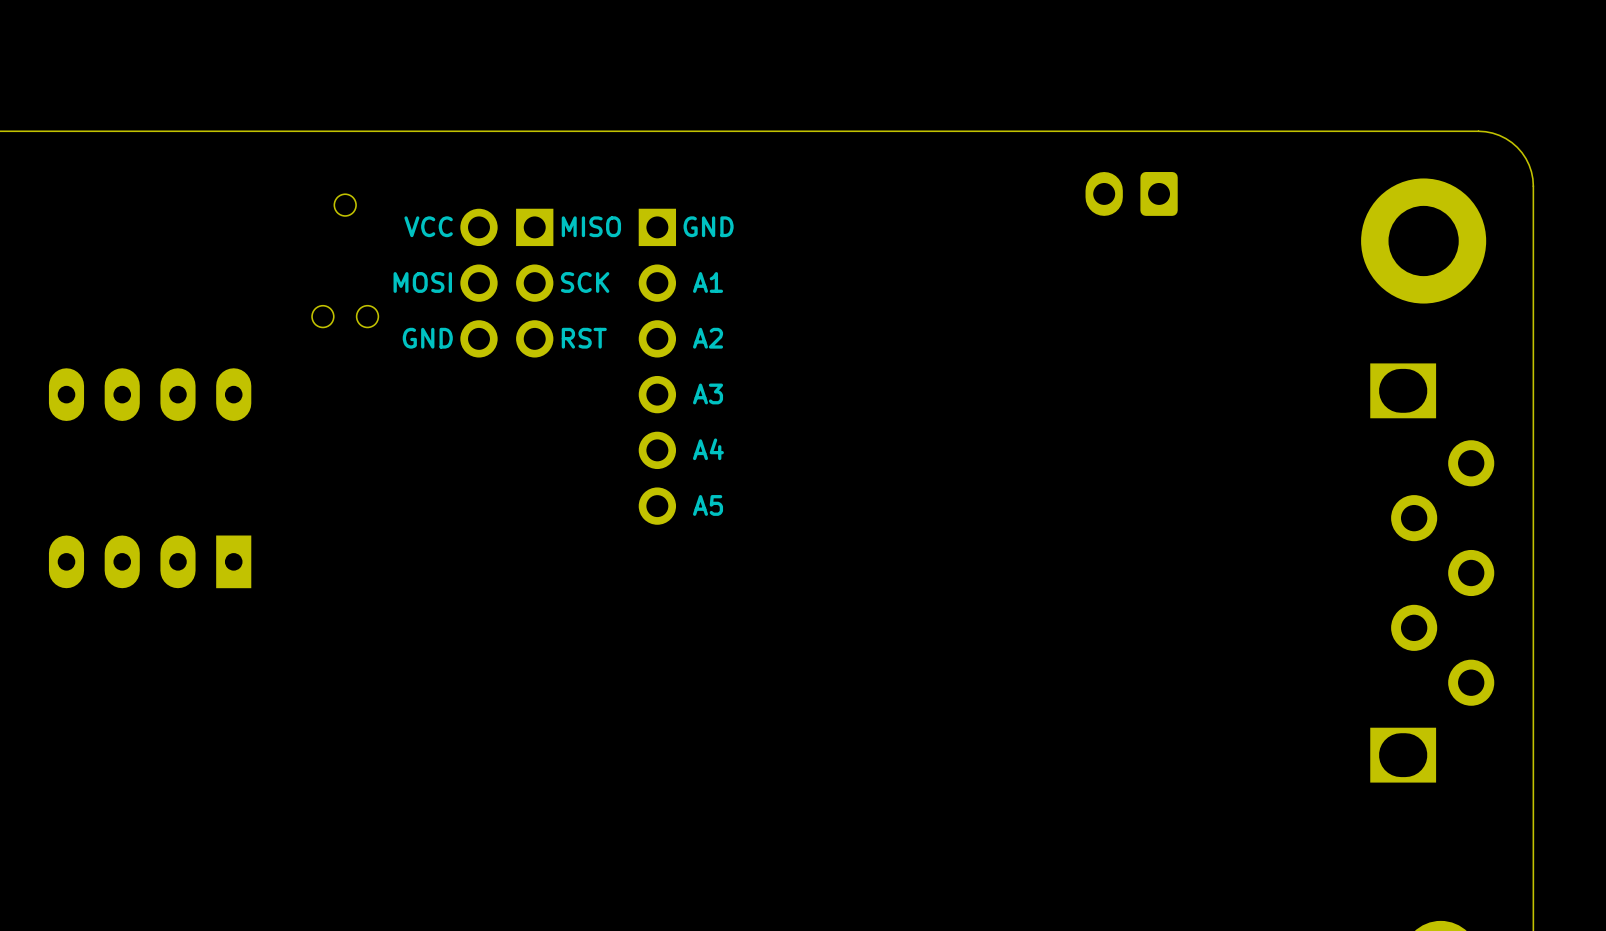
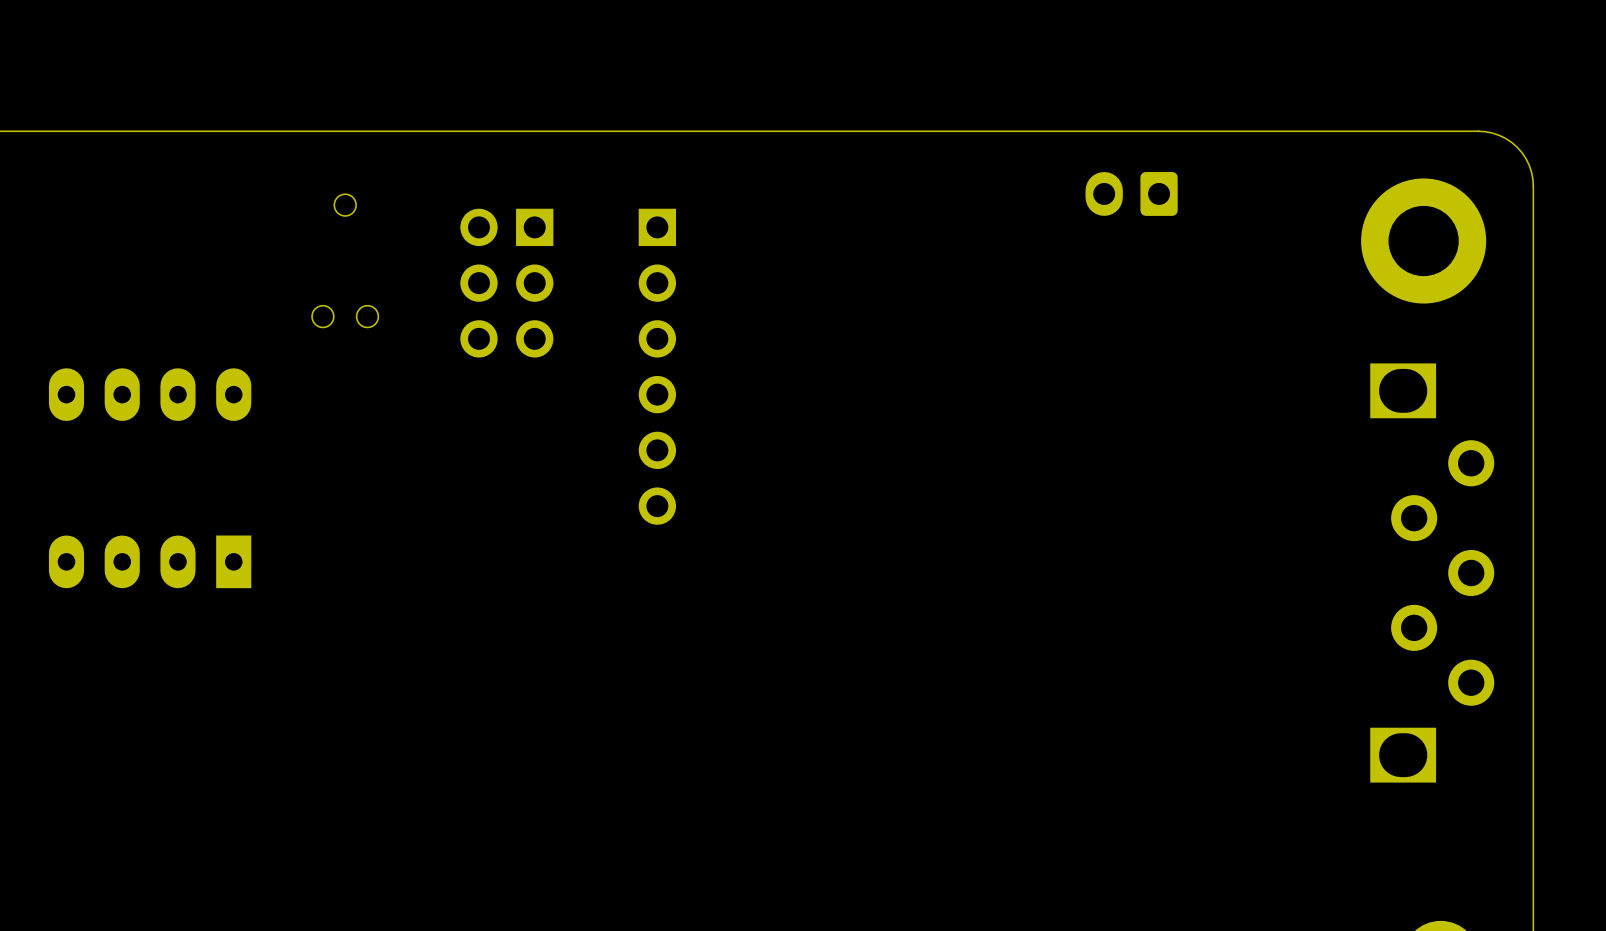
text: VCC (428, 226) -> none
text: MISO (591, 226) -> none
text: GND (708, 226) -> none
text: MOSI (422, 282) -> none
text: SCK (585, 282) -> none
text: A1 (708, 282) -> none
text: GND (427, 338) -> none
text: RST (584, 338) -> none
text: A2 (708, 338) -> none
text: A3 (708, 393) -> none
text: A4 (708, 449) -> none
text: A5 (708, 505) -> none

